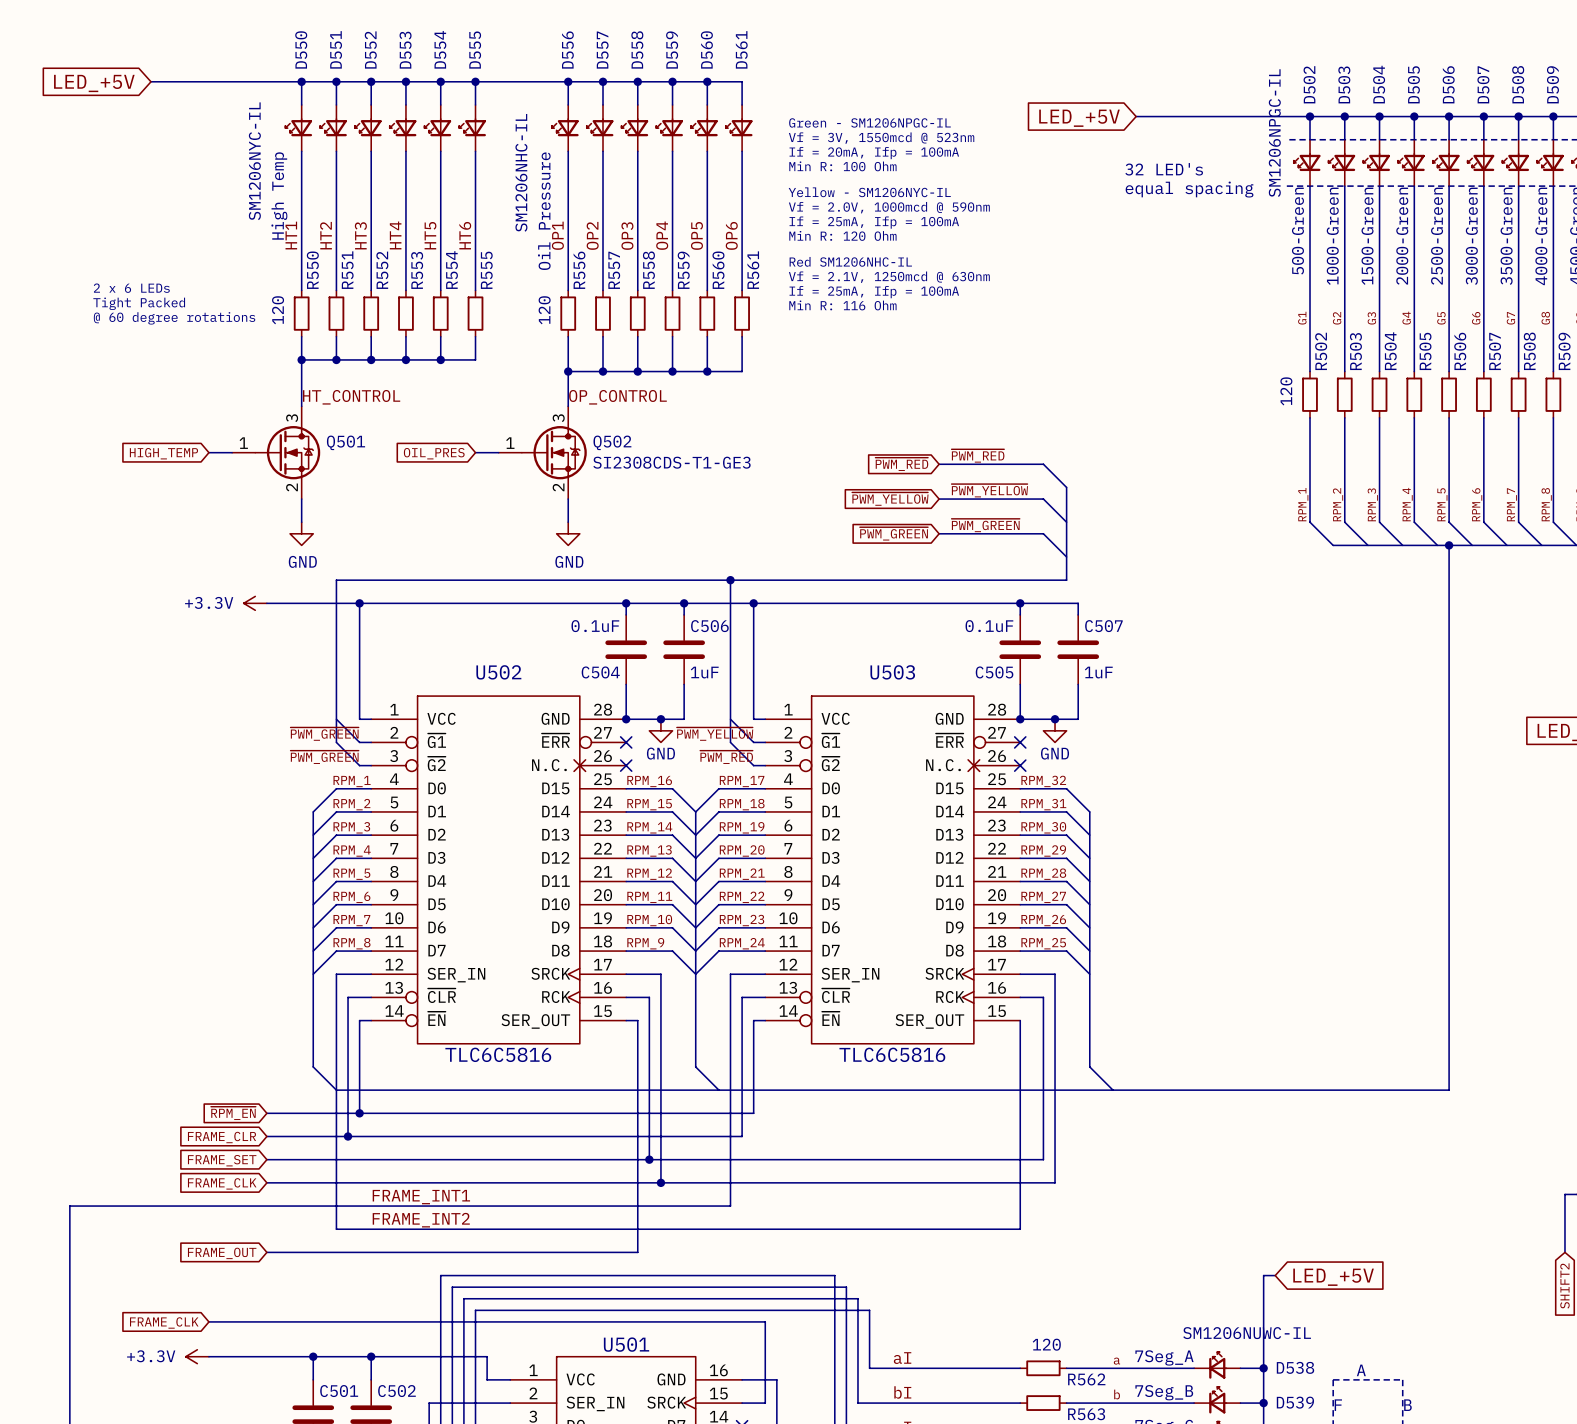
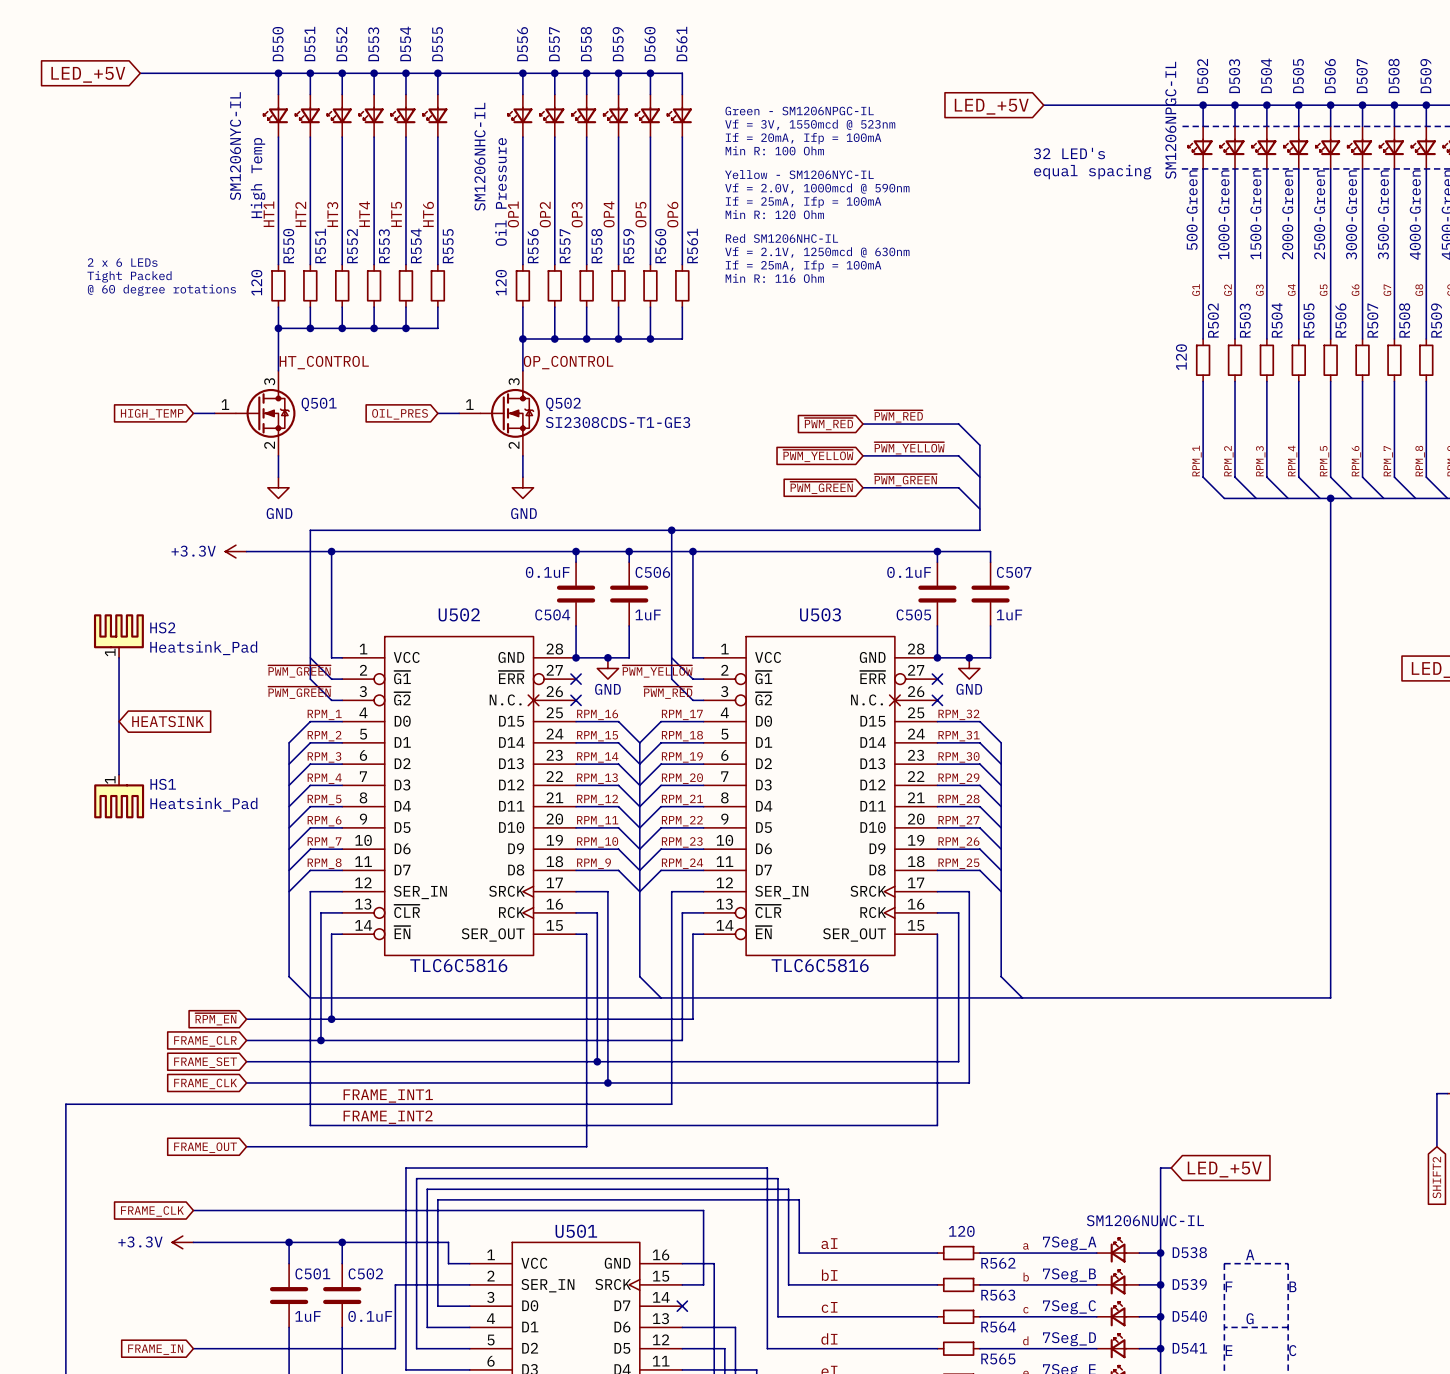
HS2: none -> Heatsink_Pad (118, 636)
wire: none -> (119, 657) (119, 774)
global label: none -> HEATSINK (167, 721)
HS1: none -> Heatsink_Pad (119, 796)

